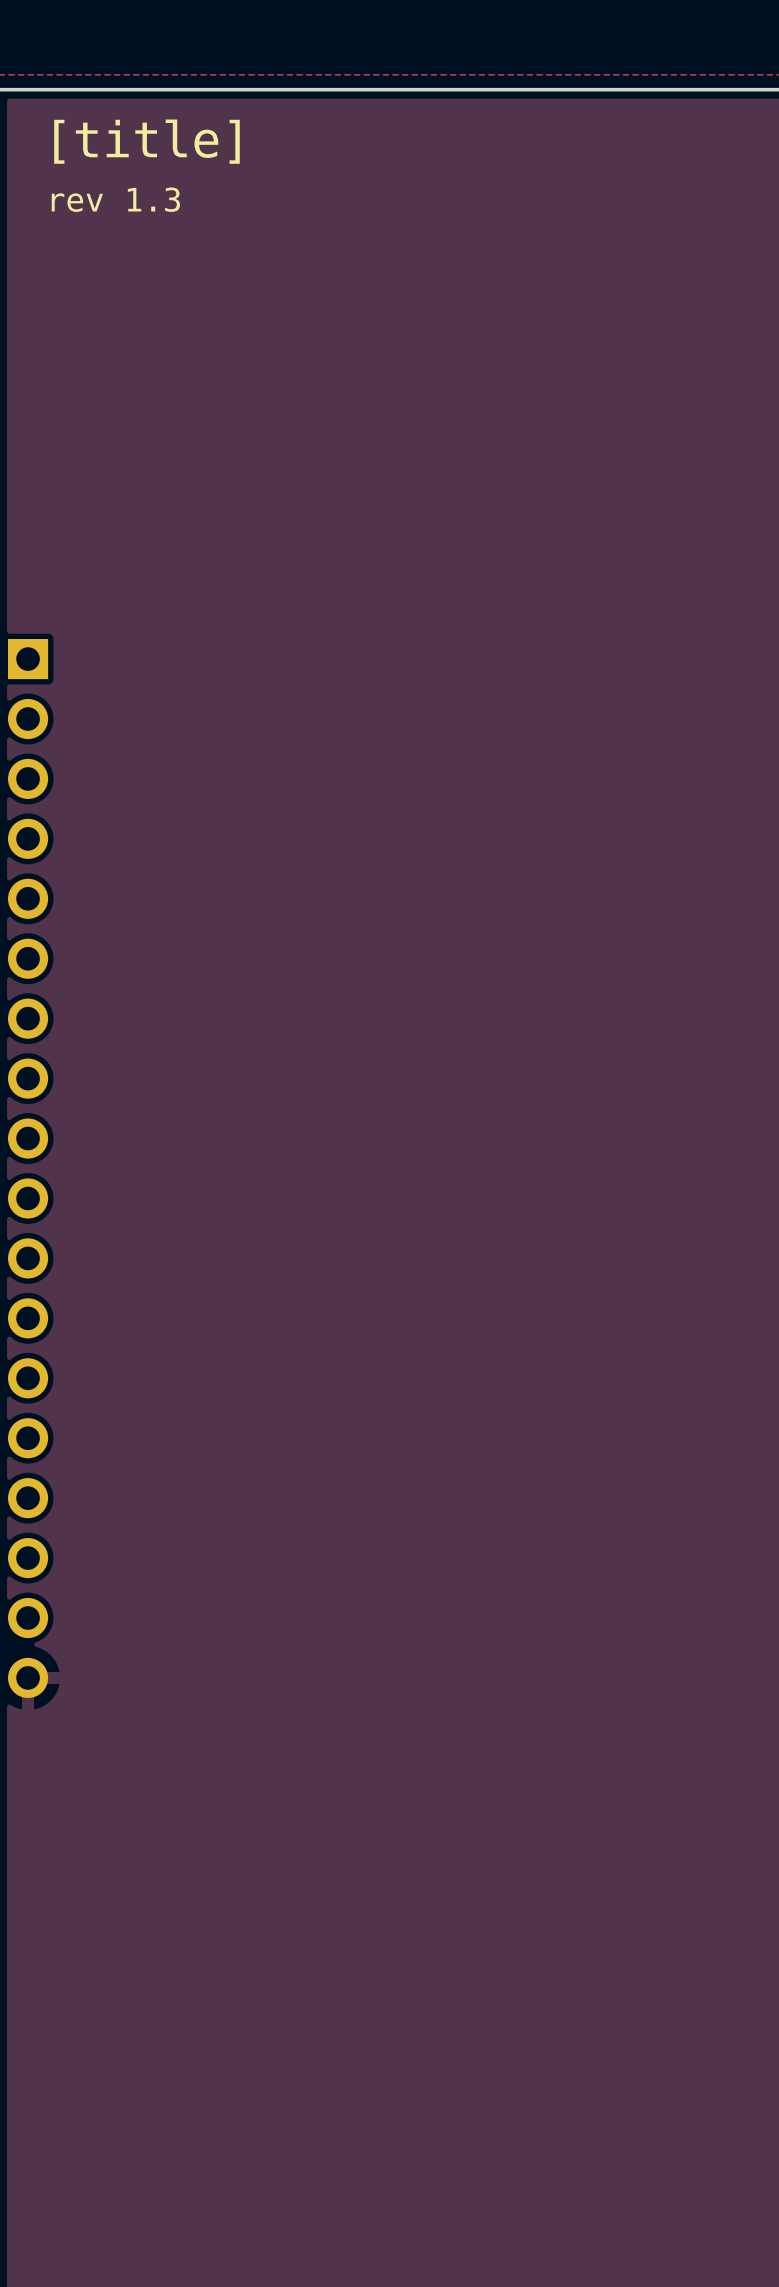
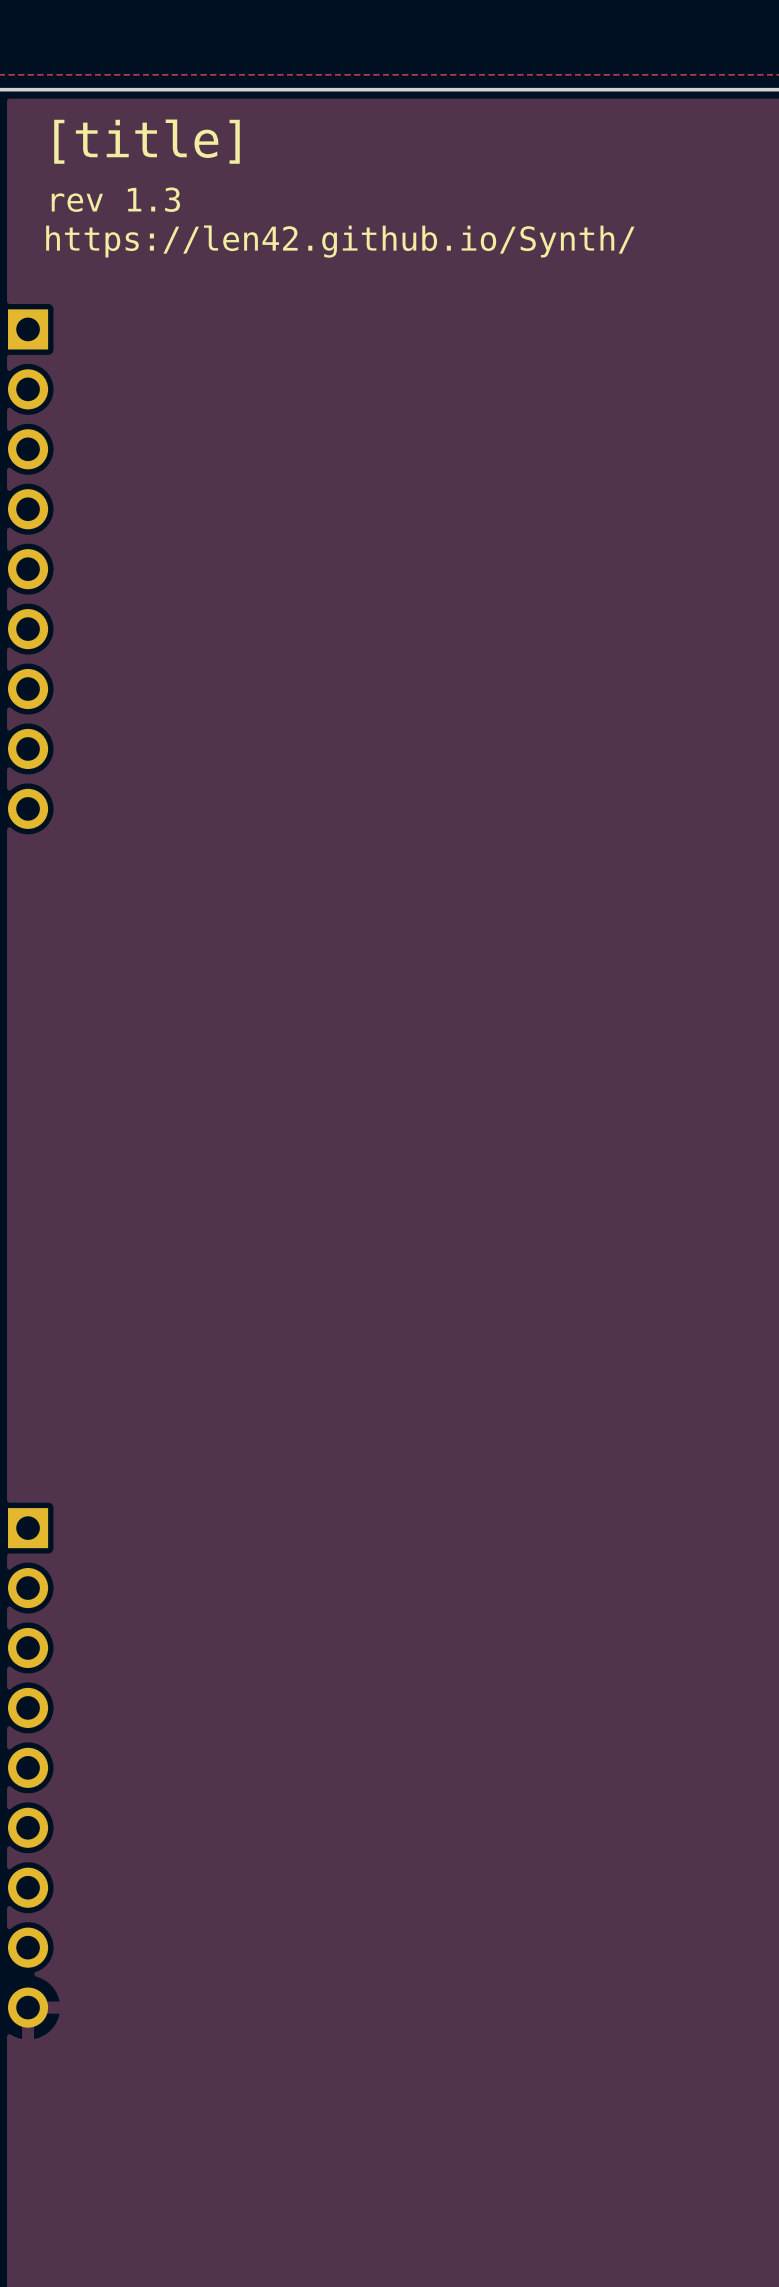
text: none -> https://len42.github.io/Synth/ (340, 241)
part: none -> (28, 569)
part: (28, 1168) -> none
part: none -> (28, 1767)

